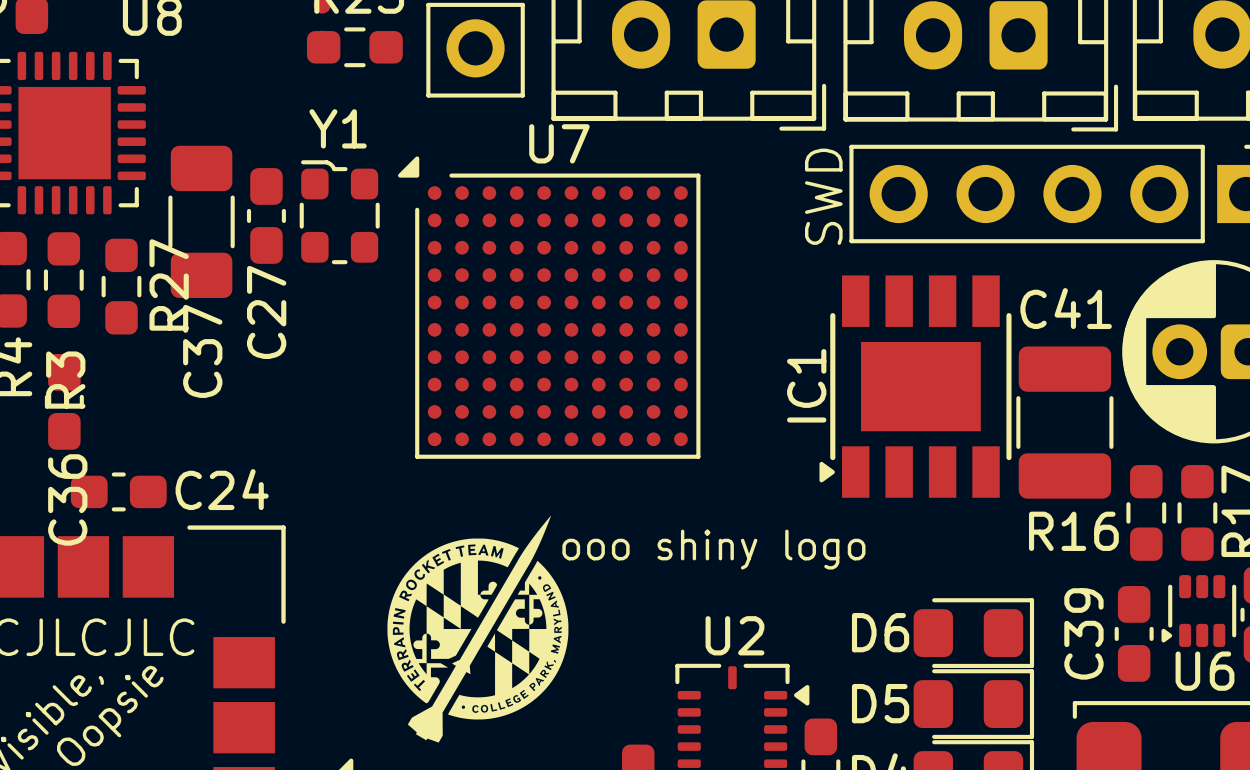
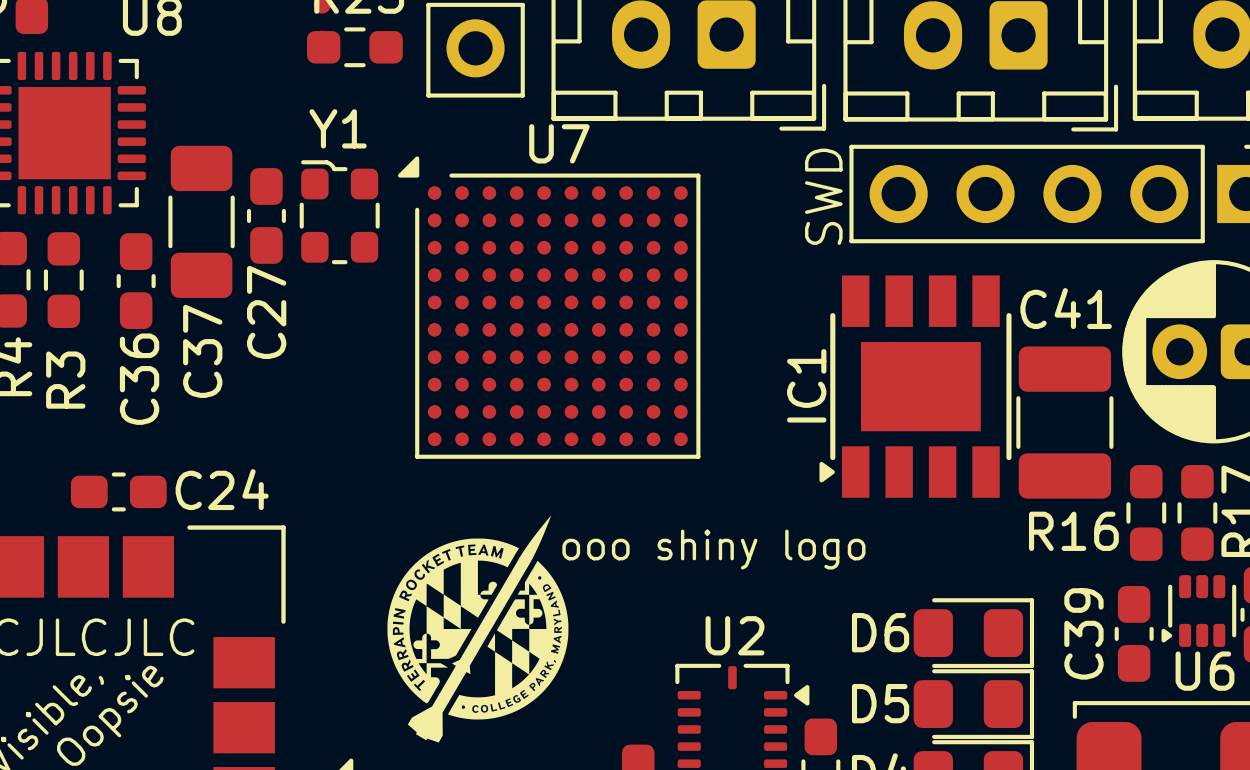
R27: (121, 286) -> none
C36 position: (64, 401) -> (136, 281)

